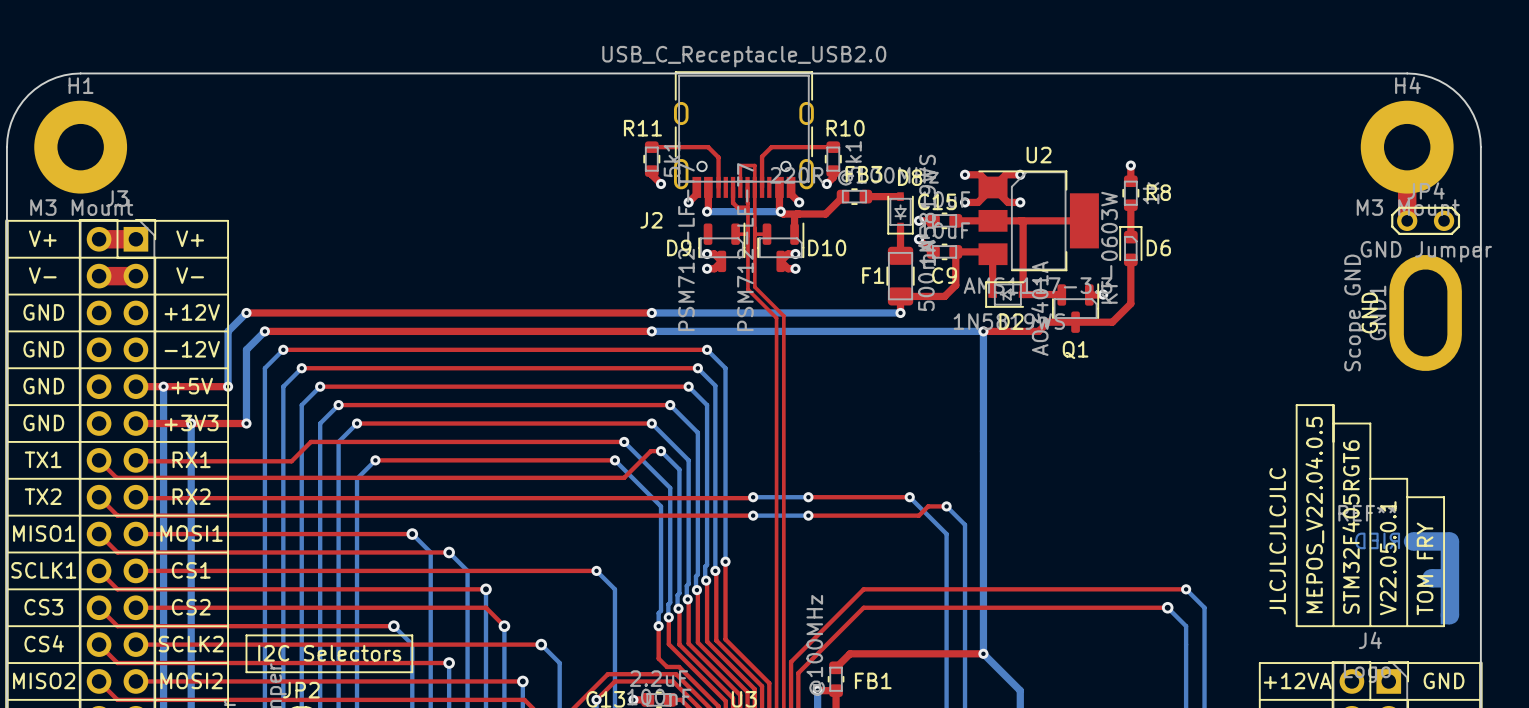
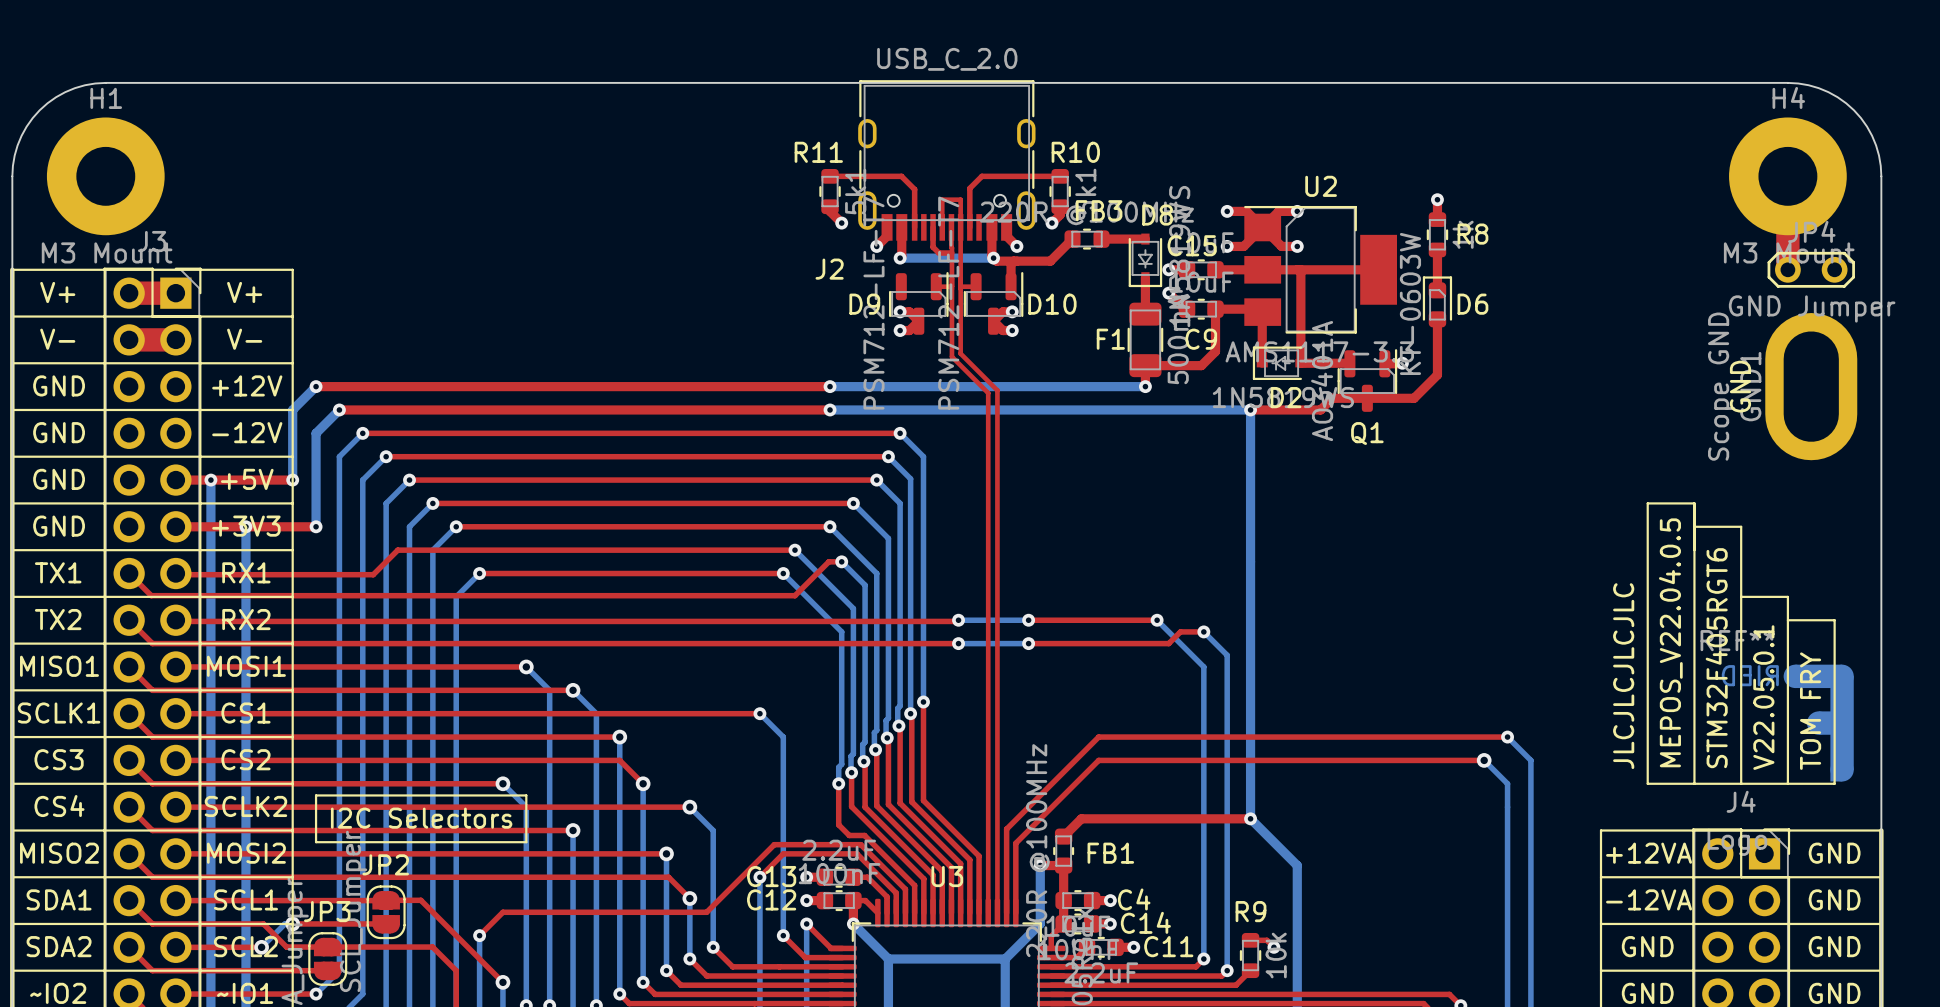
J2 value: USB_C_Receptacle_USB2.0 (744, 56) -> USB_C_2.0 (947, 59)

